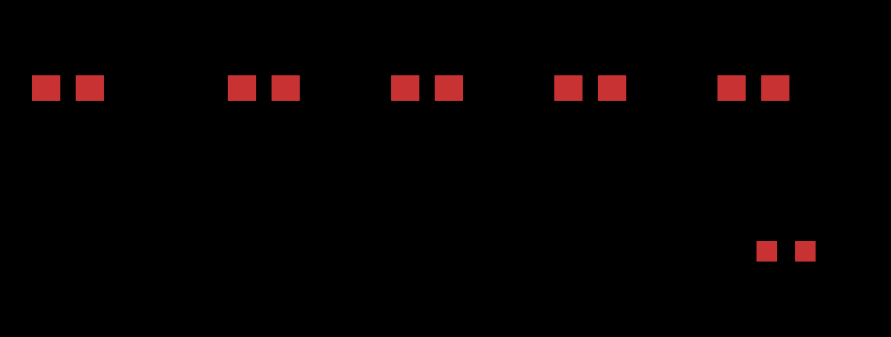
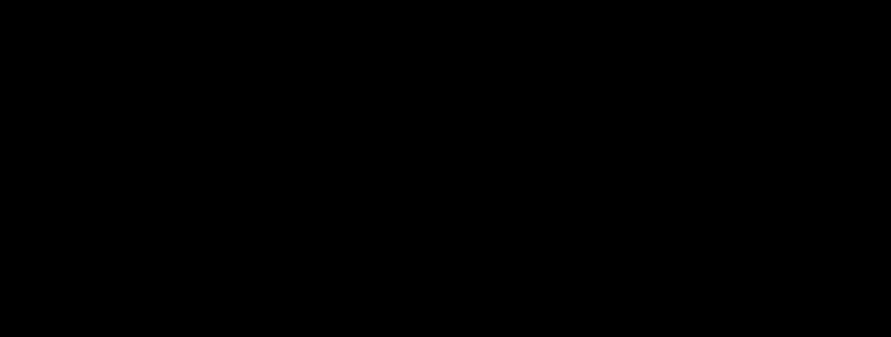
part: (67, 88) -> none
part: (263, 88) -> none
part: (427, 88) -> none
part: (590, 88) -> none
part: (753, 88) -> none
part: (786, 251) -> none

